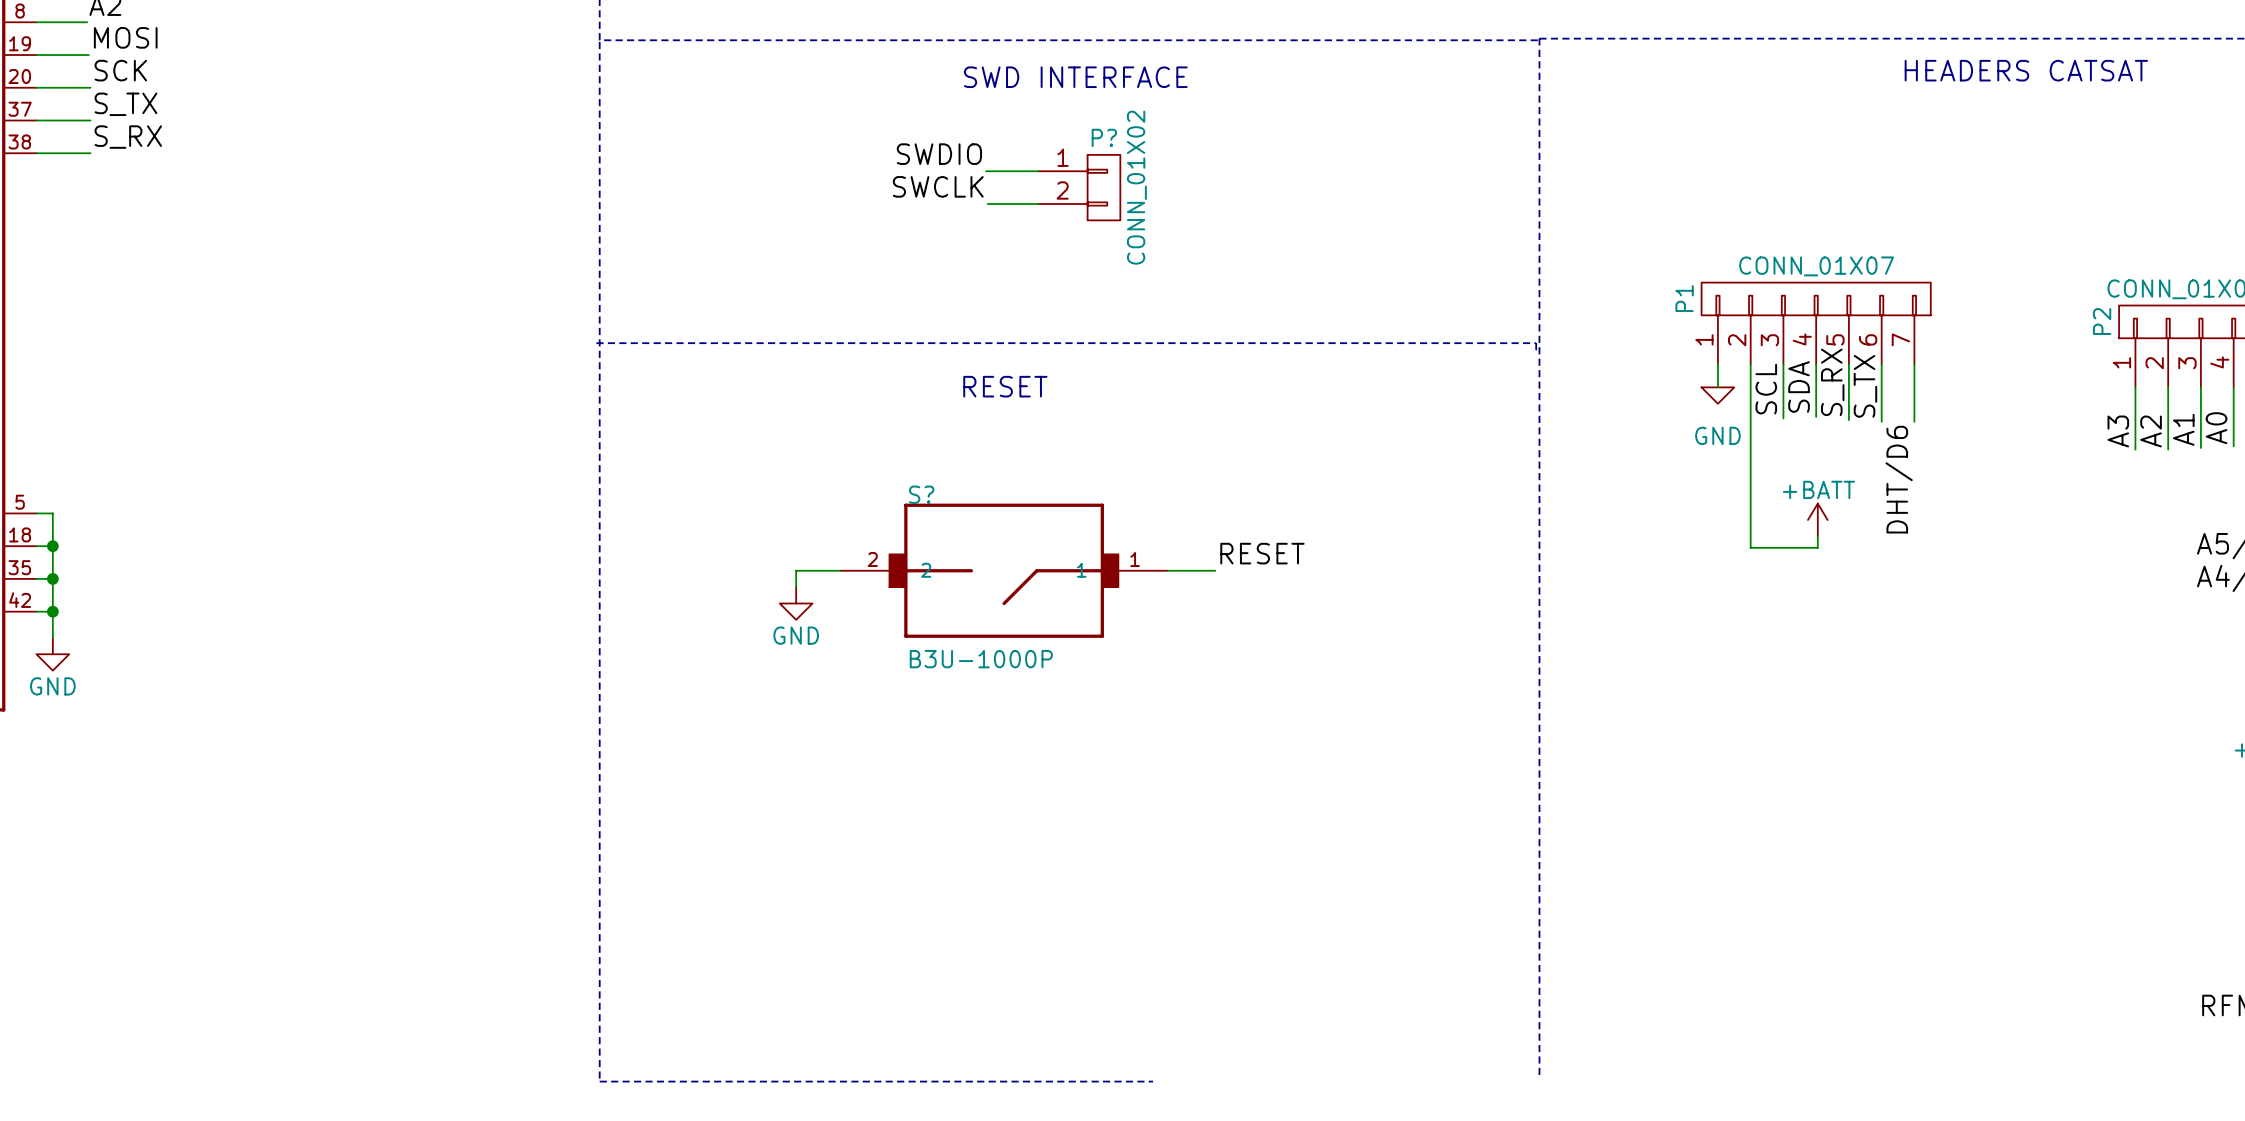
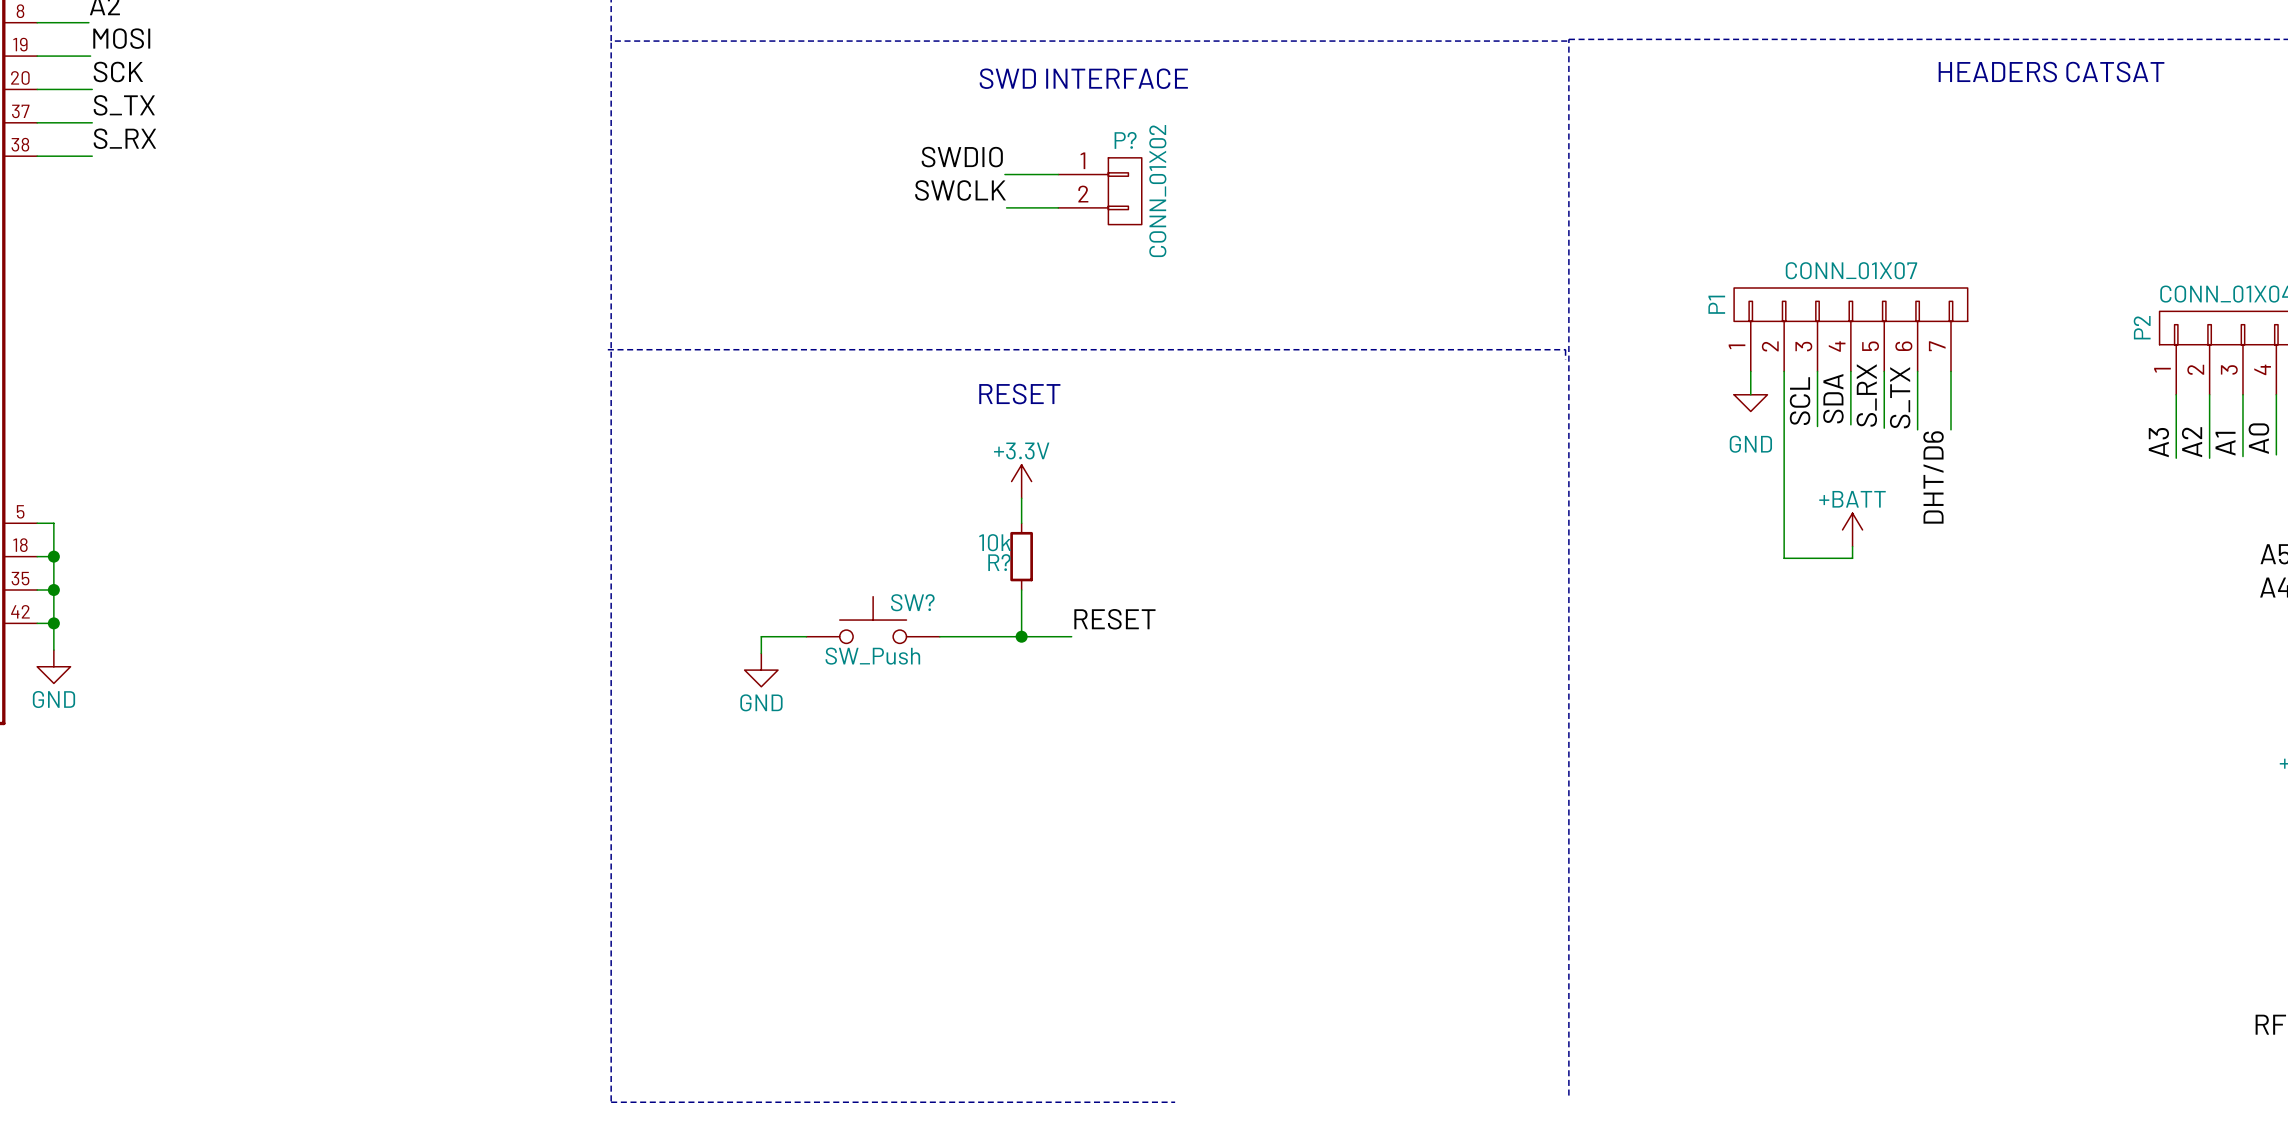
power symbol: none -> +3.3V (1021, 481)
wire: none -> (1021, 498) (1021, 523)
R?: none -> 10k (1021, 556)
label position: RESET (1262, 553) -> RESET (1114, 619)
wire: (840, 570) (796, 570) (796, 587) -> (806, 636) (761, 636) (761, 653)
S?: B3U-1000P (1004, 570) -> none
wire: (1167, 570) (1215, 570) -> none
wire: none -> (1021, 590) (1021, 636)
power symbol position: GND (796, 603) -> GND (761, 670)
SW?: none -> SW_Push (873, 620)
wire: none -> (939, 636) (1071, 636)
junction: none -> (1021, 636)

